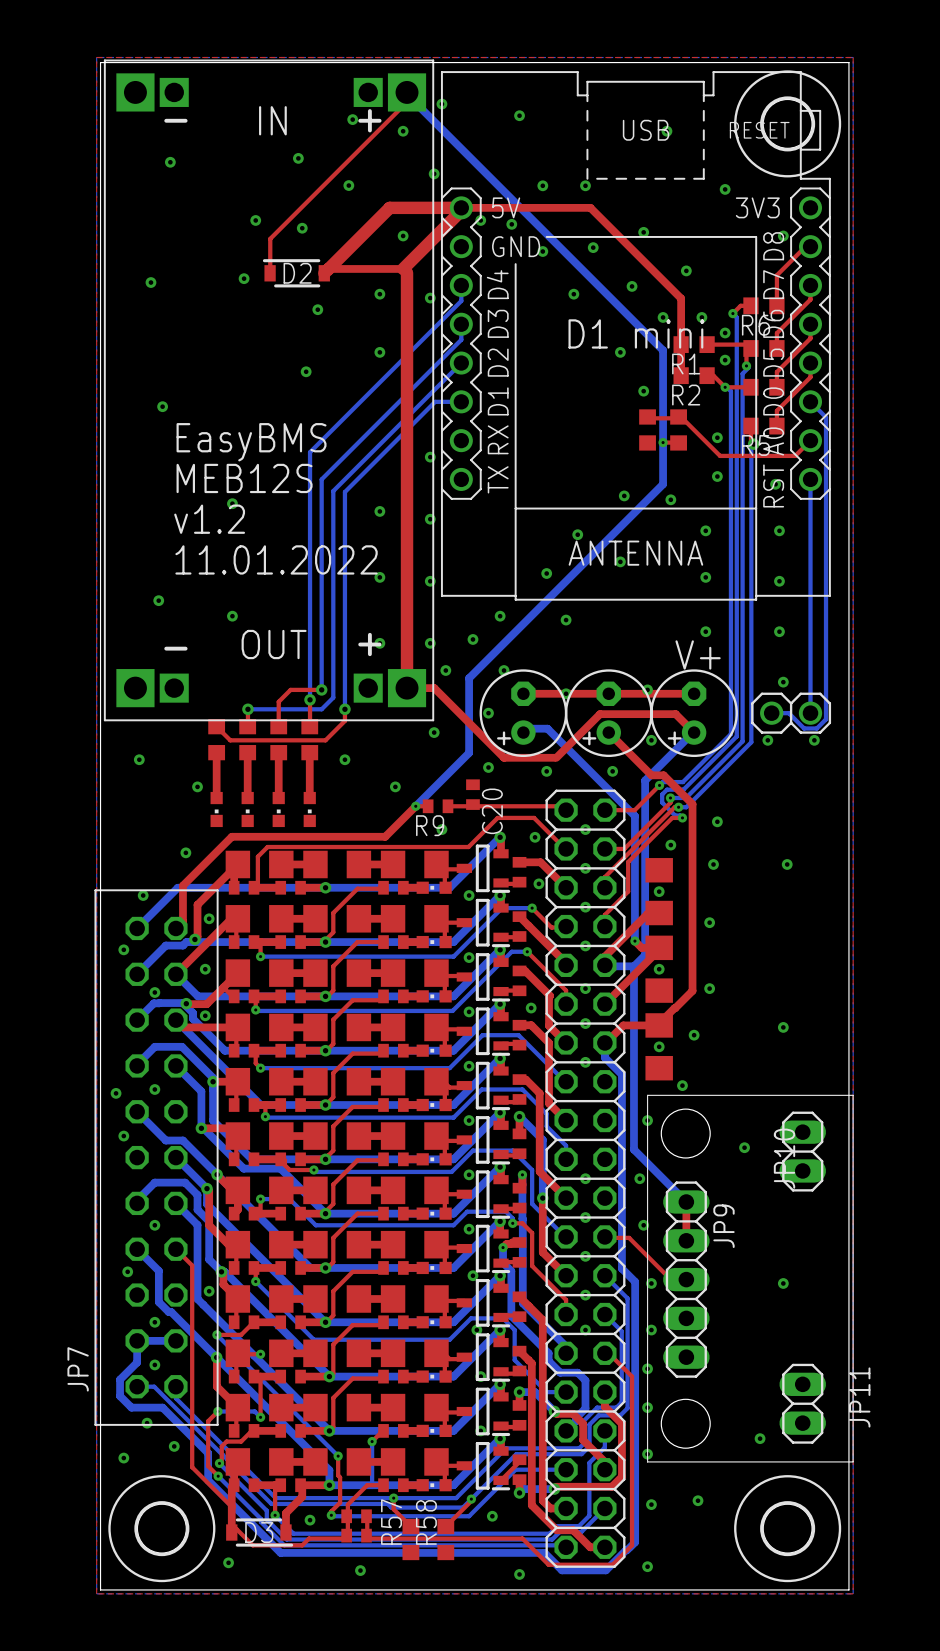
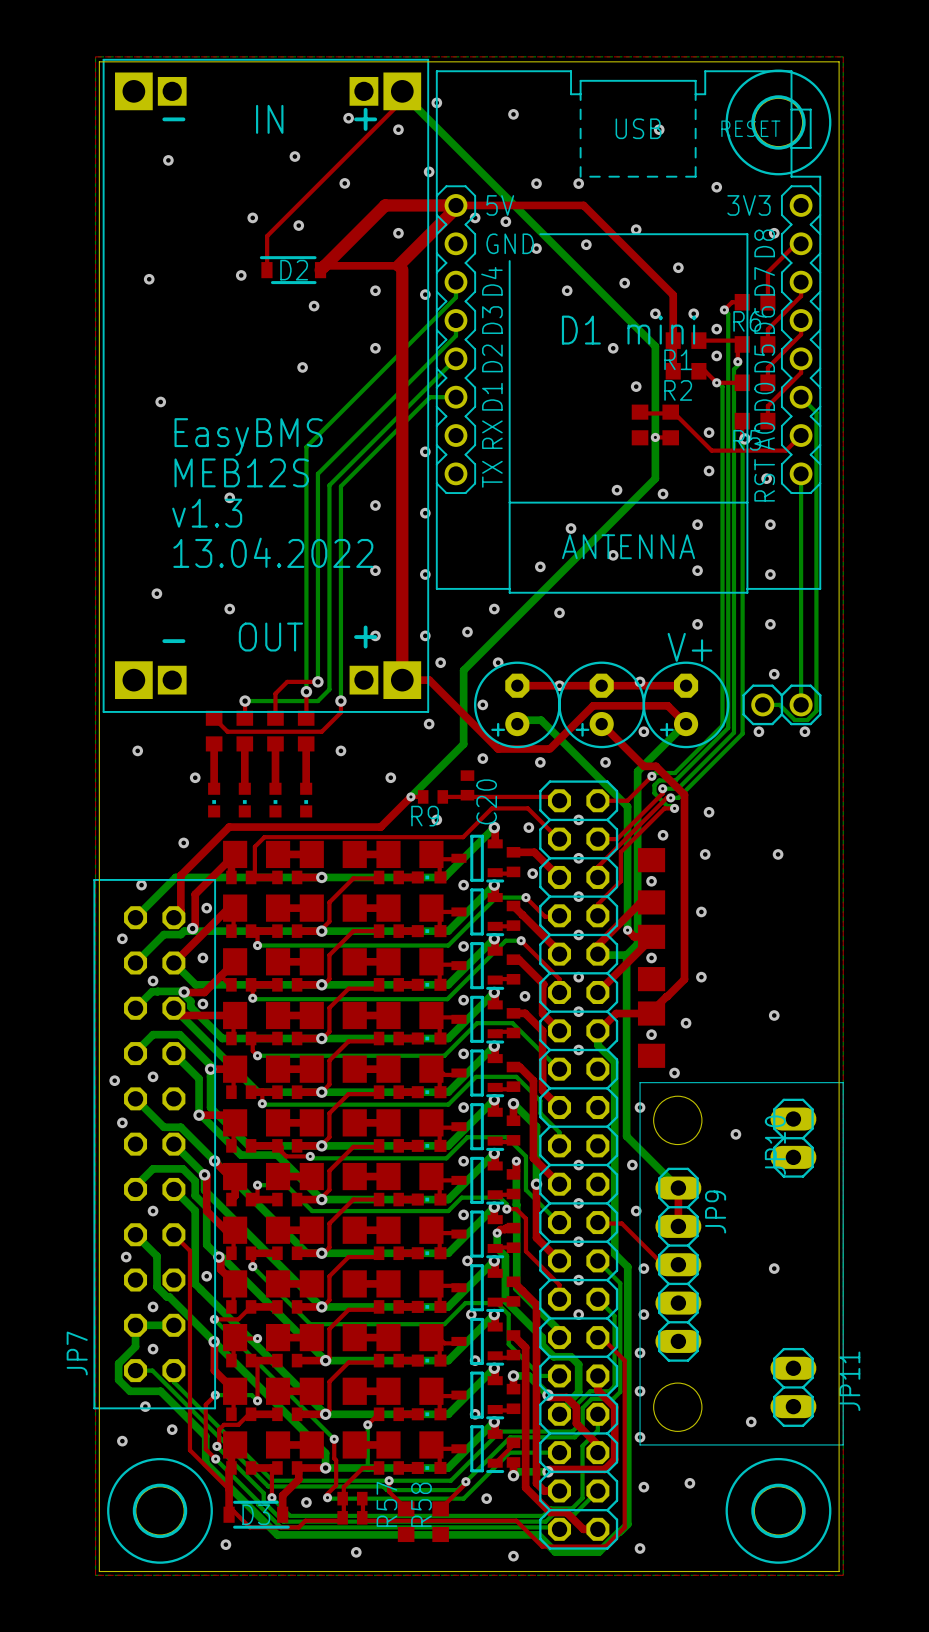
text: v1.2 (209, 519) -> v1.3 (207, 513)
text: 11.01.2022 (276, 559) -> 13.04.2022 (273, 552)

